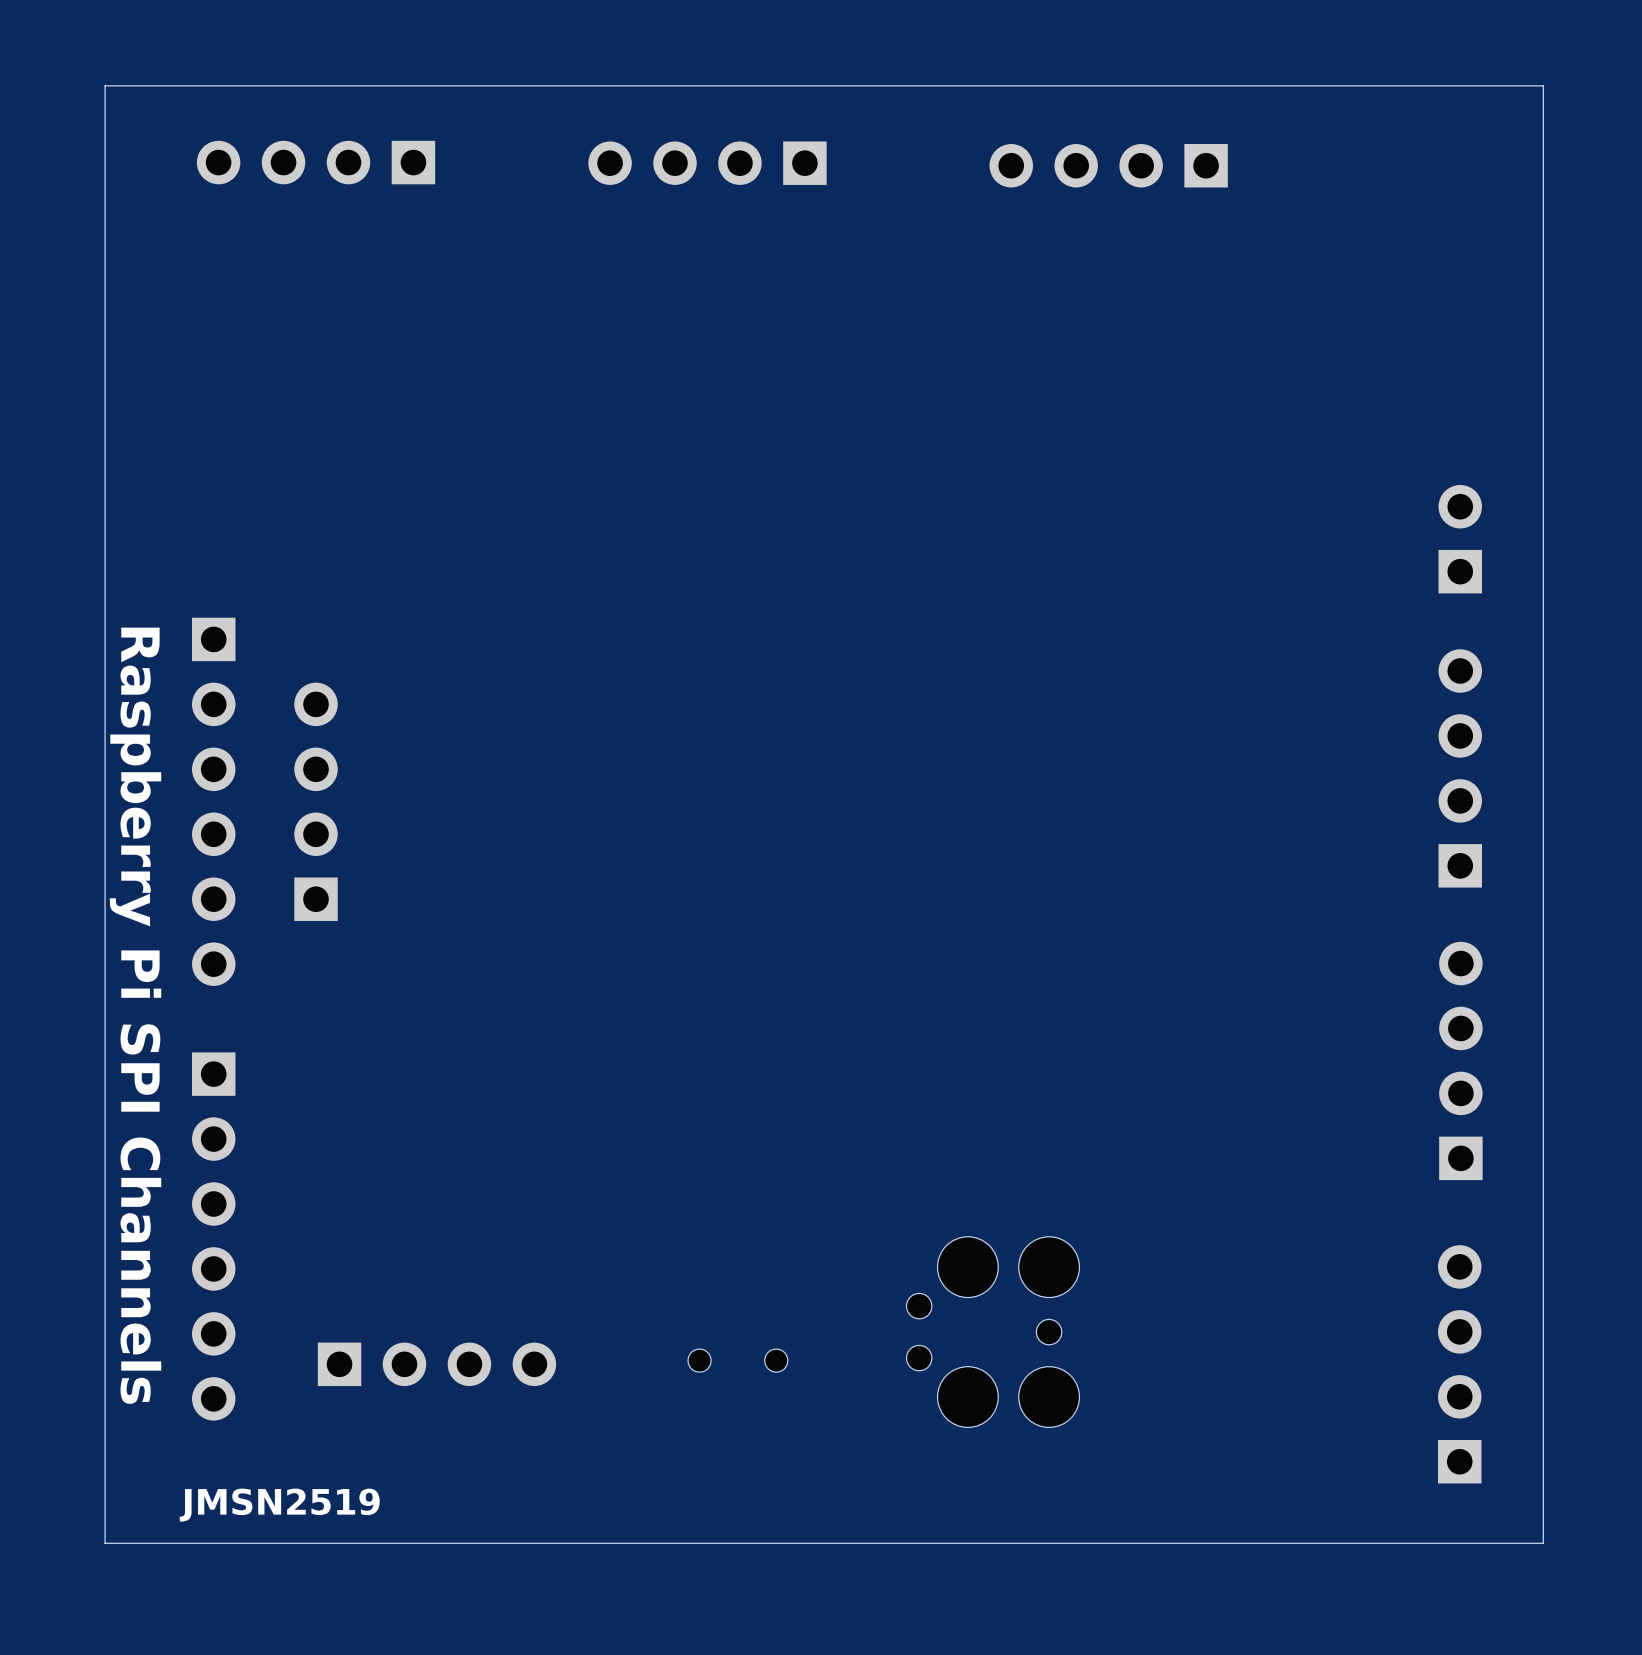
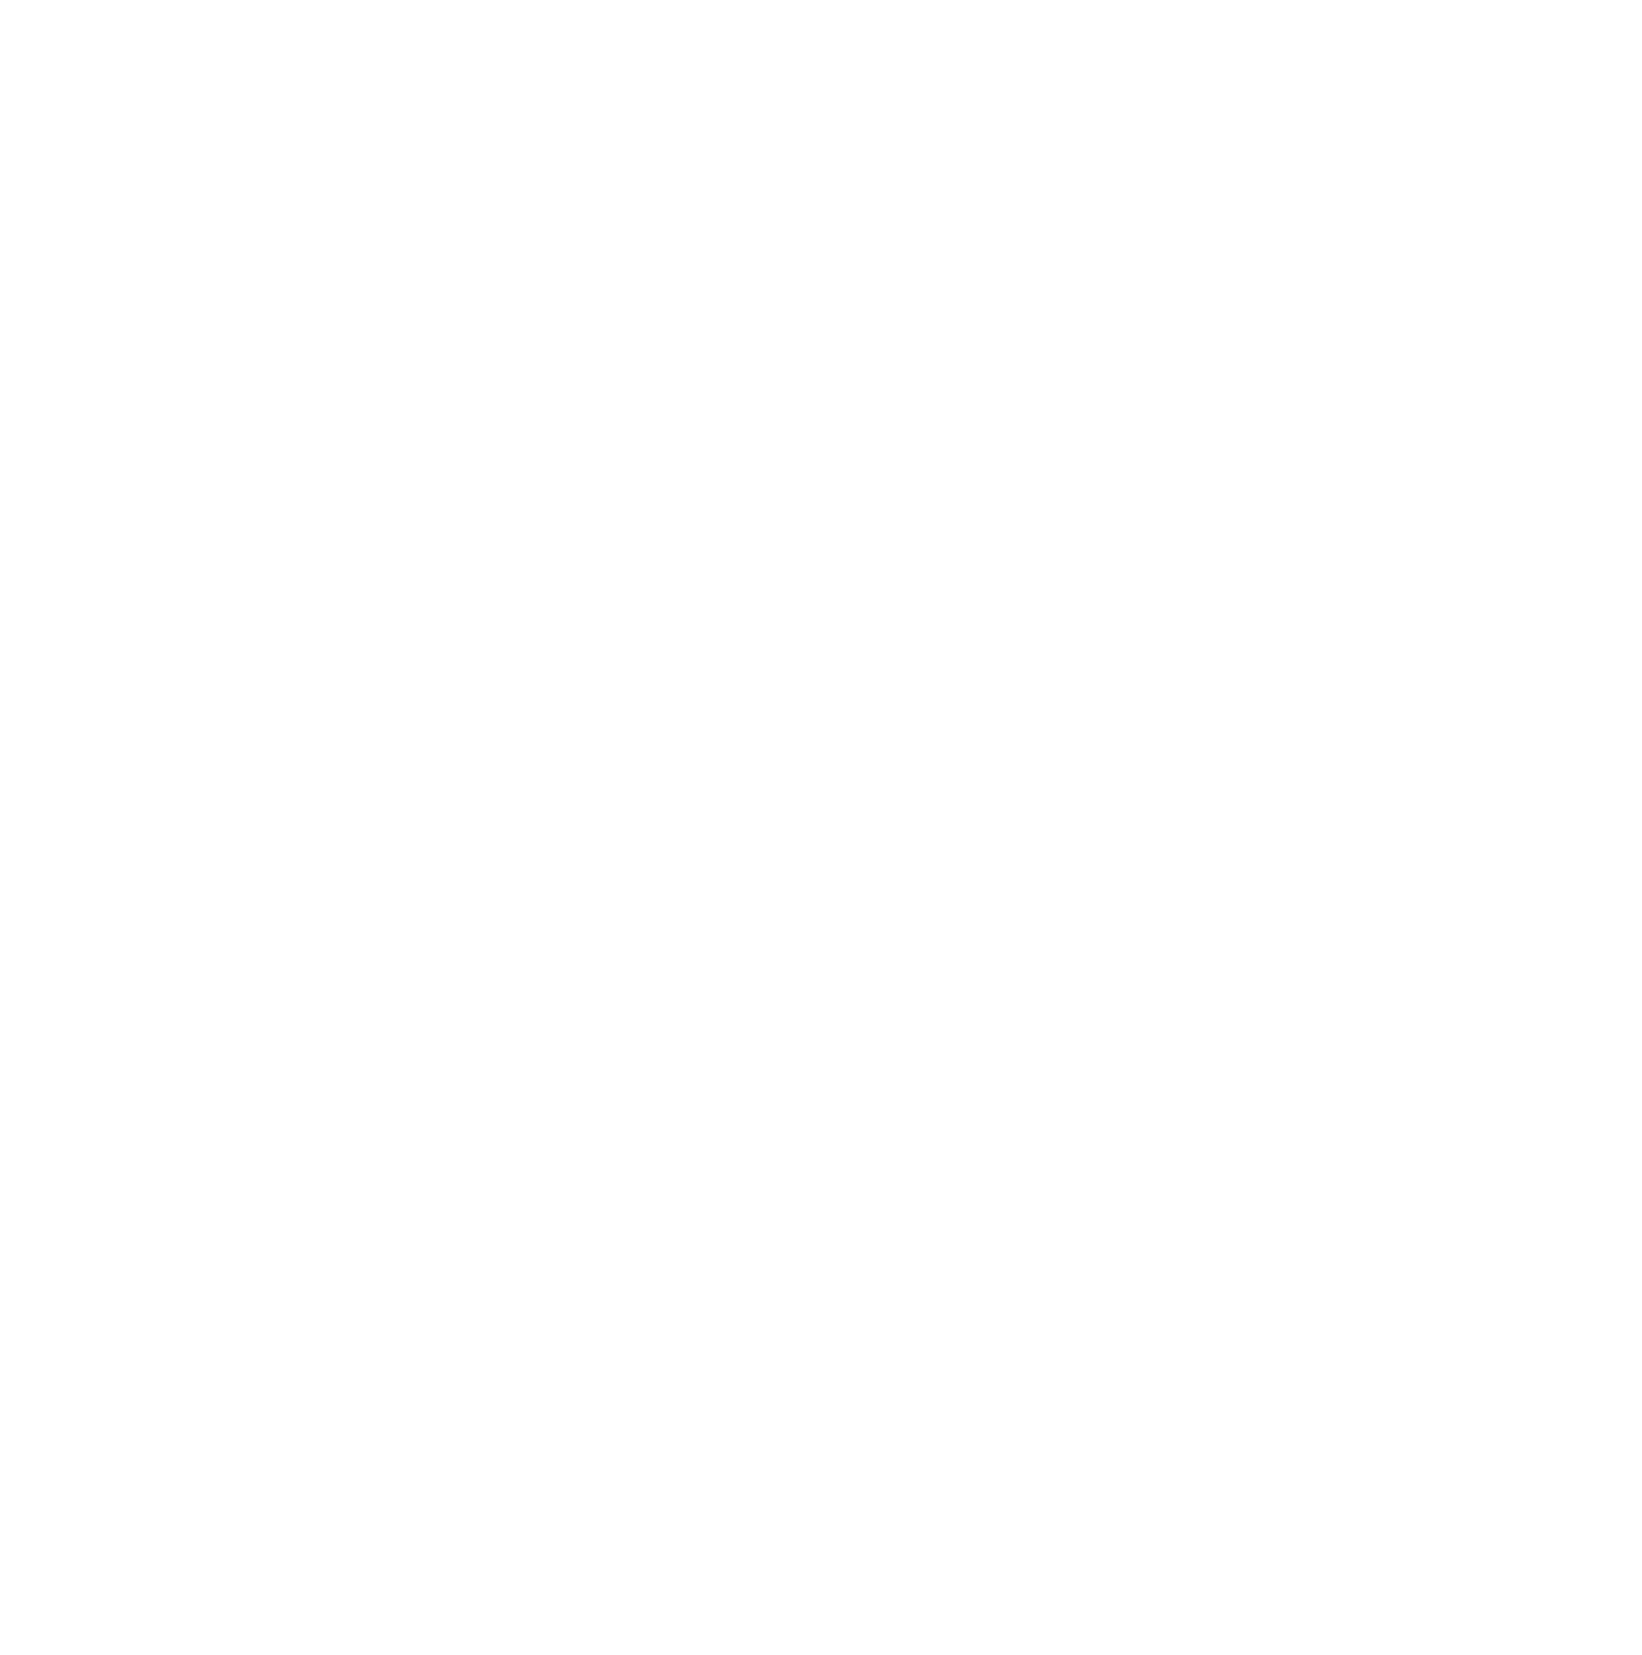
board edge: (1543, 85) (105, 85) (105, 1543) (1543, 1543) (1543, 85) -> none
part: (316, 162) -> none
part: (707, 163) -> none
part: (1108, 165) -> none
part: (1460, 539) -> none
part: (1460, 768) -> none
part: (213, 801) -> none
part: (316, 801) -> none
text: Raspberry Pi SPI Channels (135, 1015) -> none
part: (1460, 1060) -> none
part: (213, 1236) -> none
part: (992, 1332) -> none
part: (737, 1360) -> none
part: (436, 1364) -> none
part: (1459, 1364) -> none
text: JMSN2519 (279, 1505) -> none

